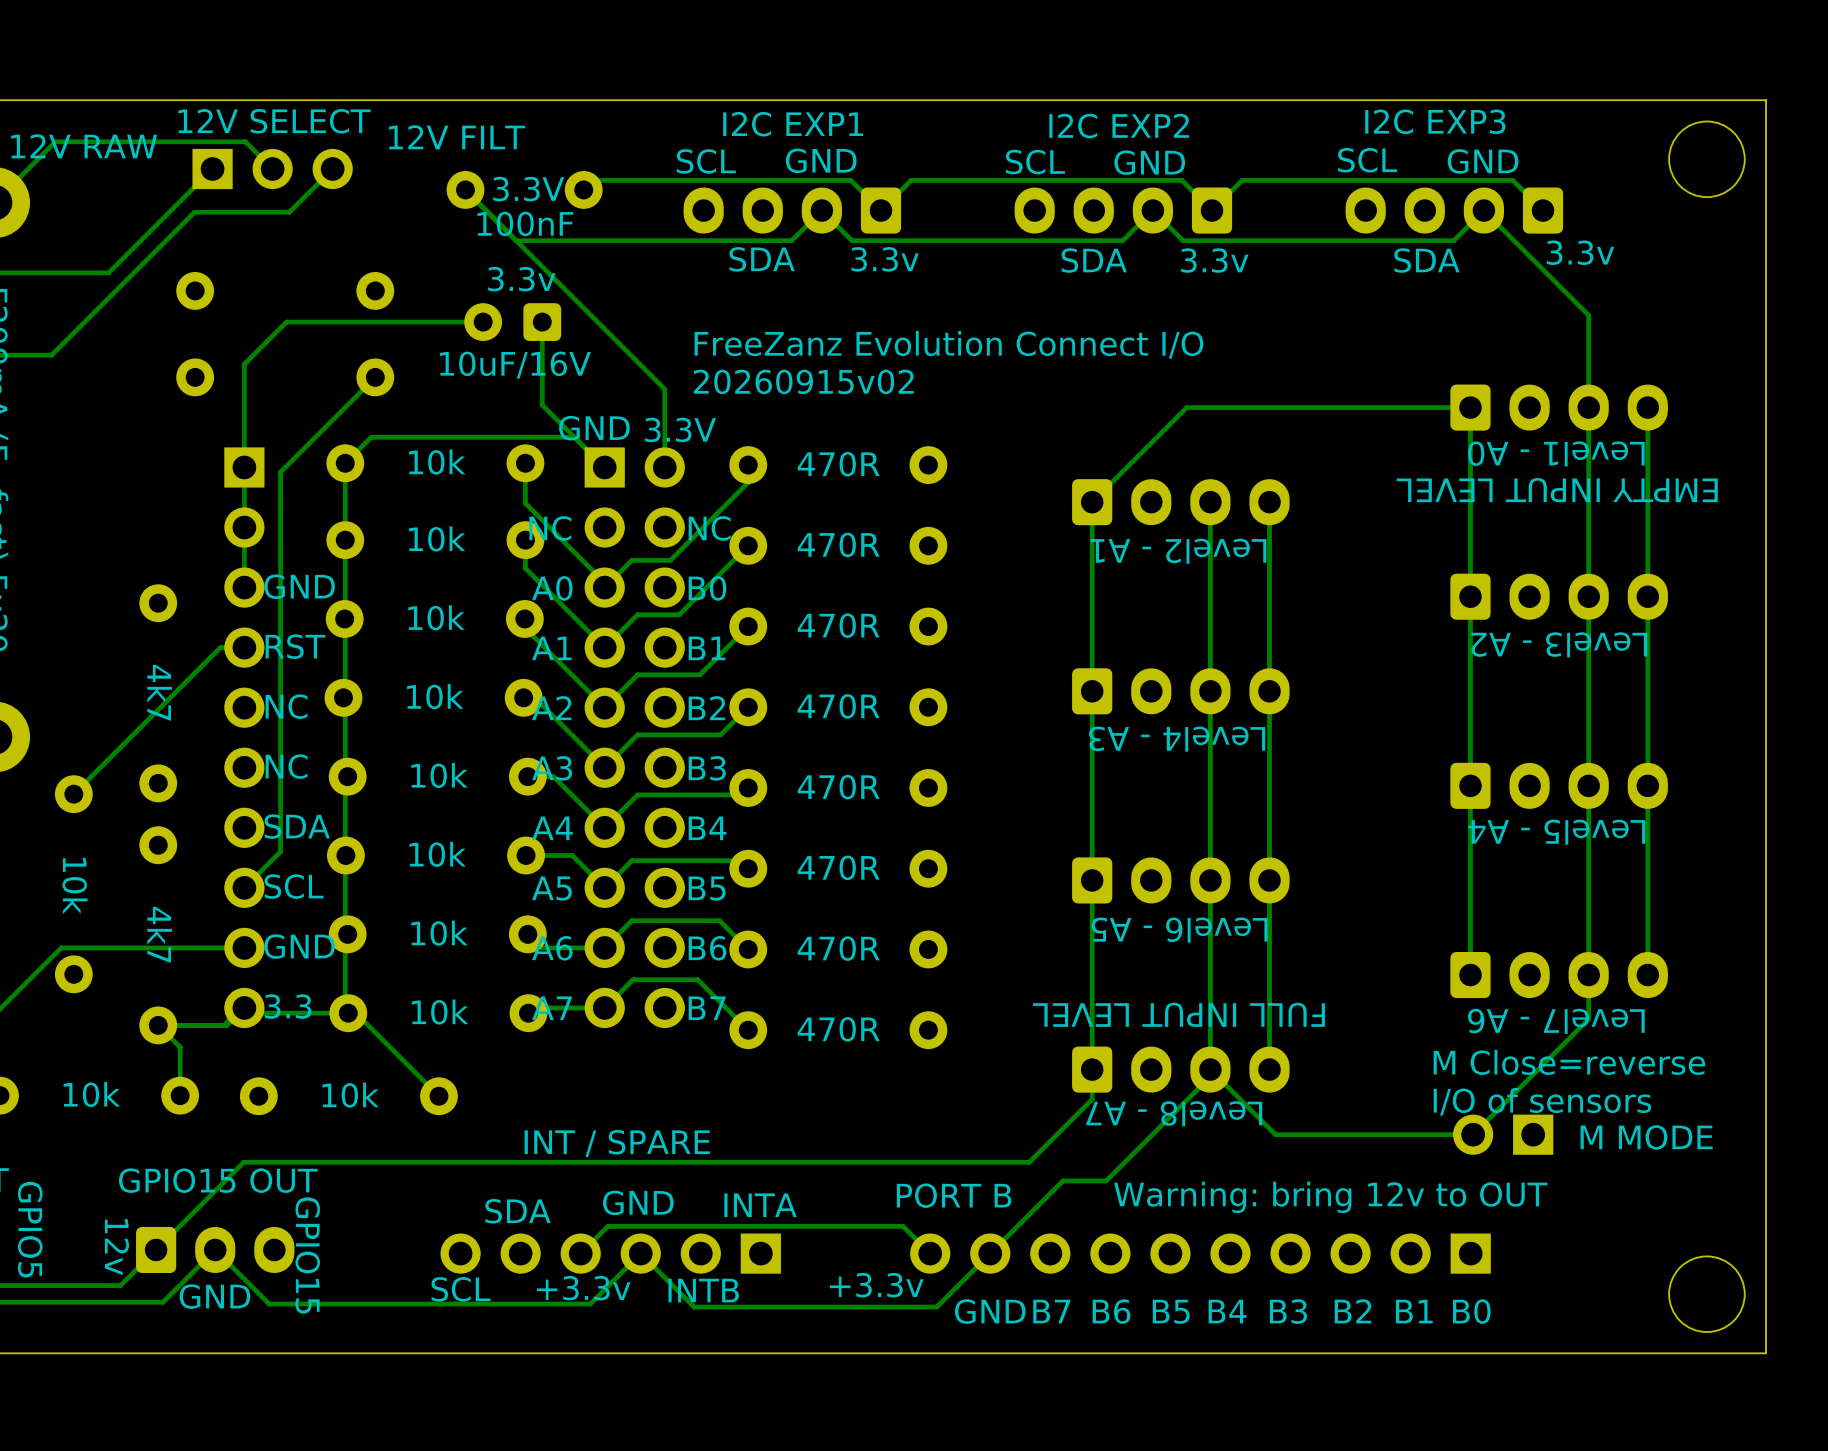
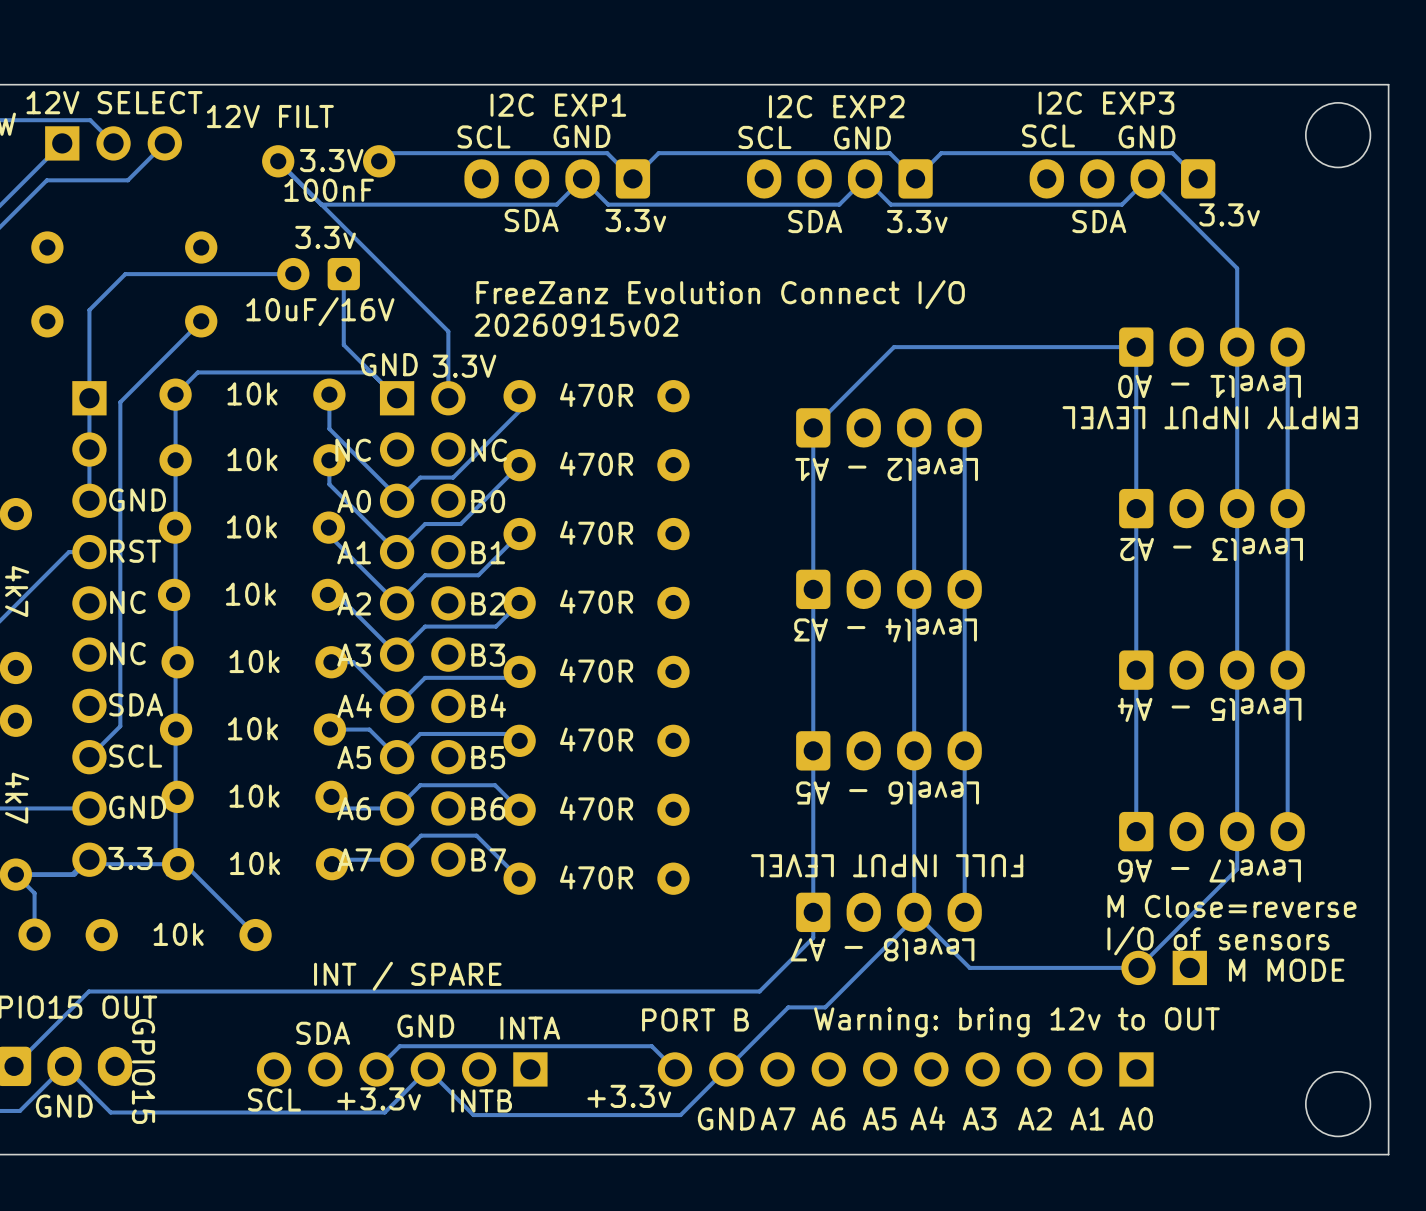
part text: B7 (1051, 1311) -> A7 (778, 1118)
part text: B6 (1111, 1311) -> A6 (828, 1118)
part text: B5 (1171, 1311) -> A5 (879, 1118)
part text: B4 (1227, 1311) -> A4 (927, 1118)
part text: B3 (1288, 1311) -> A3 (979, 1118)
part text: B2 (1352, 1311) -> A2 (1035, 1118)
part text: B1 (1414, 1311) -> A1 (1087, 1118)
part text: B0 (1471, 1311) -> A0 (1136, 1118)

